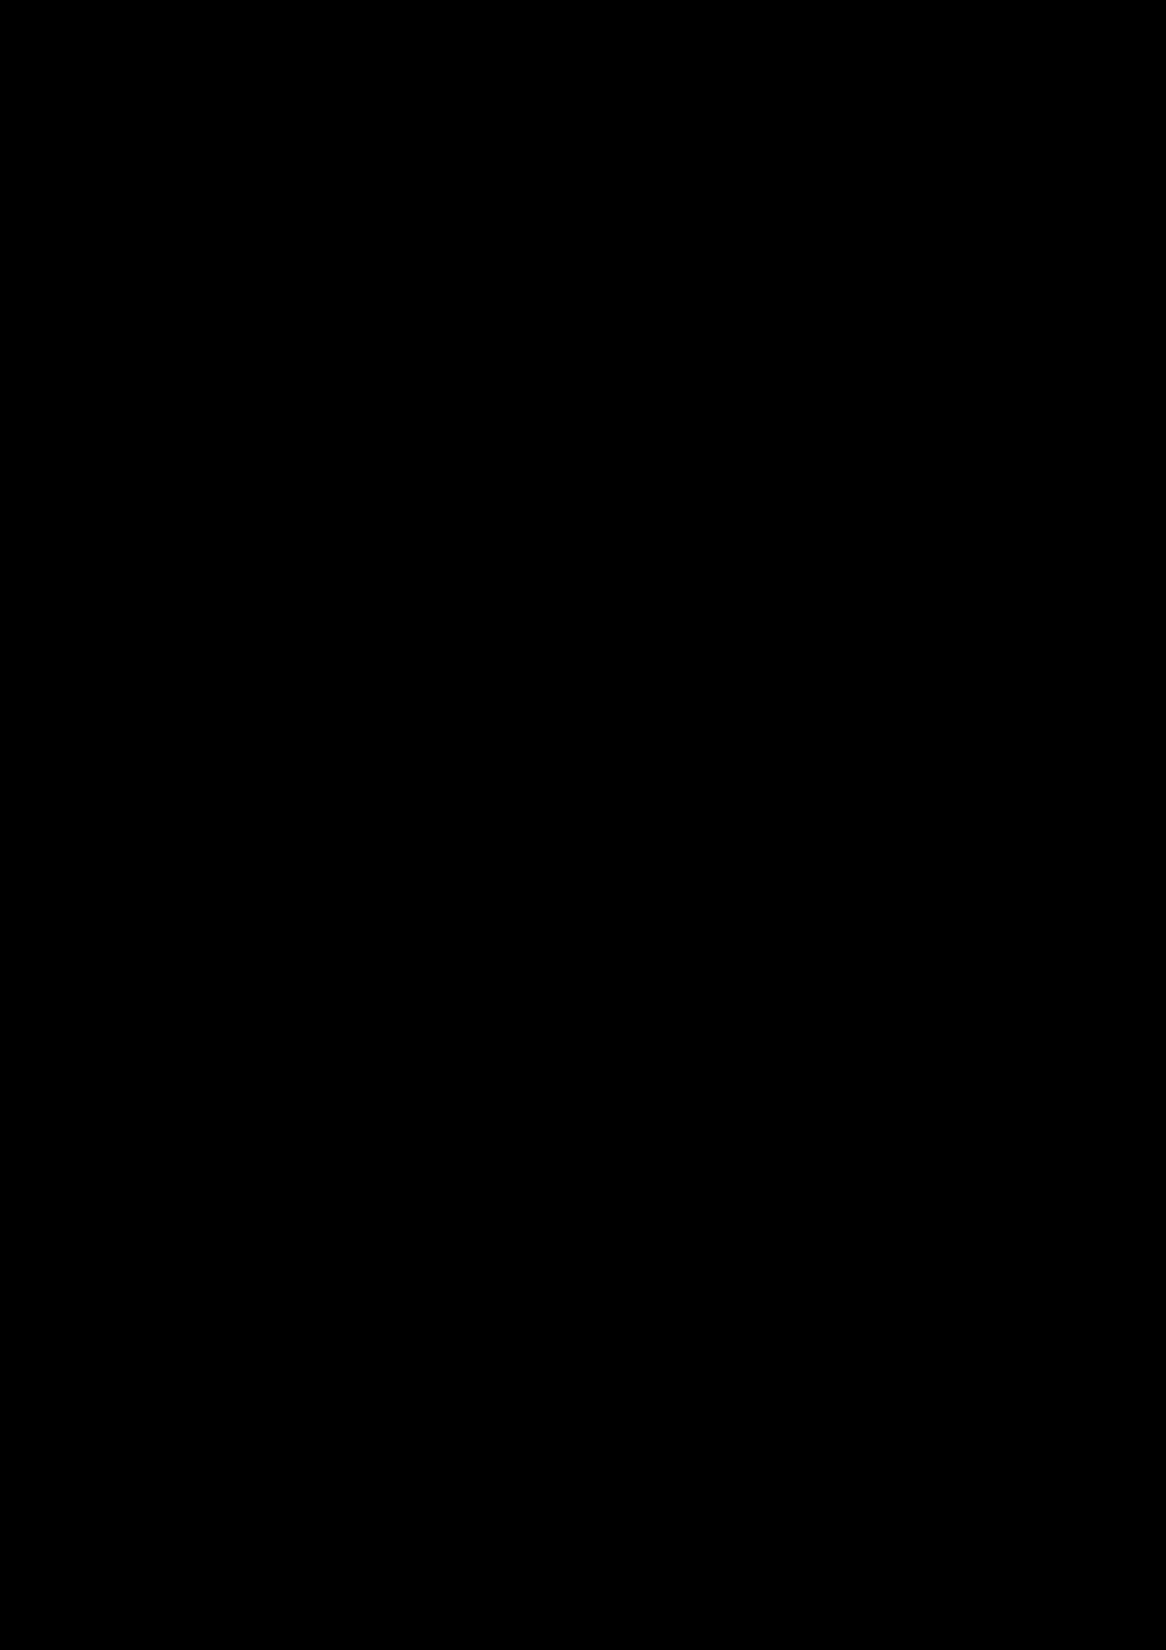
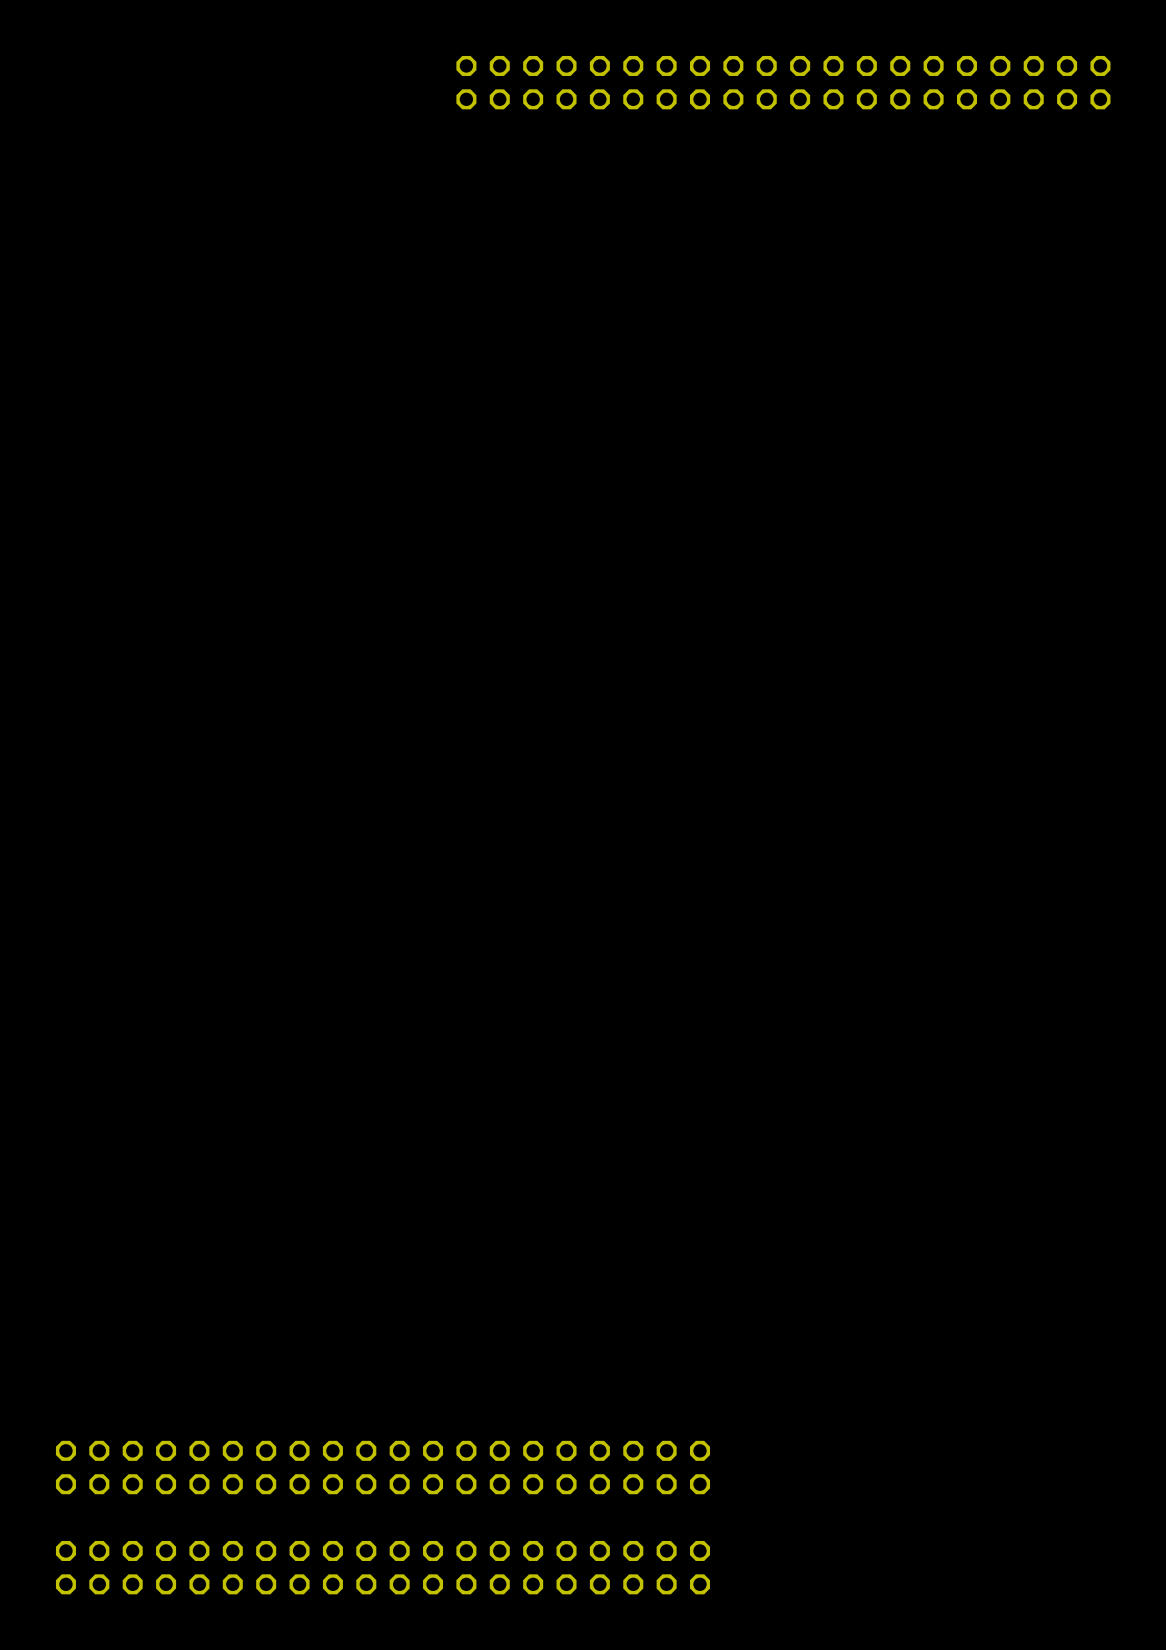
part: none -> (783, 82)
part: none -> (382, 1467)
part: none -> (382, 1567)

